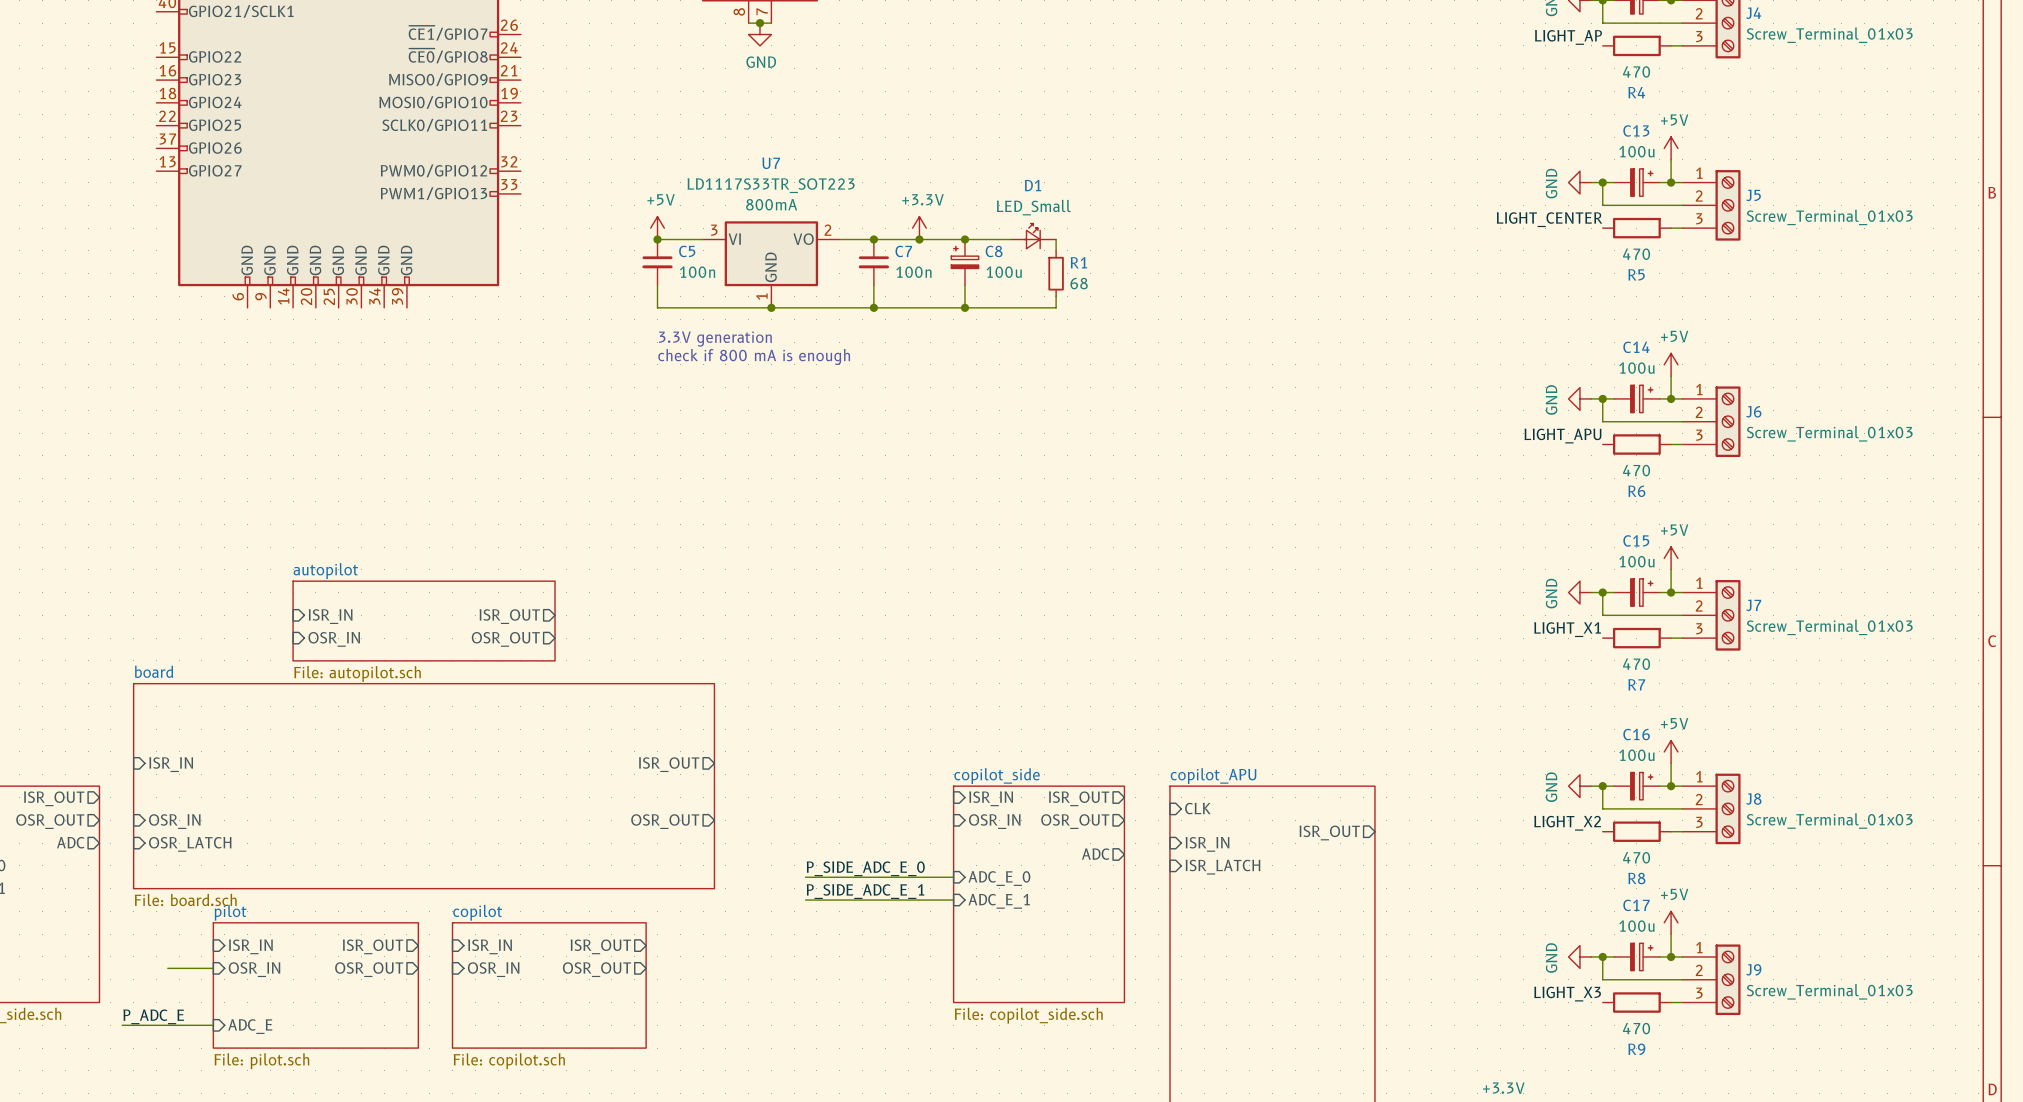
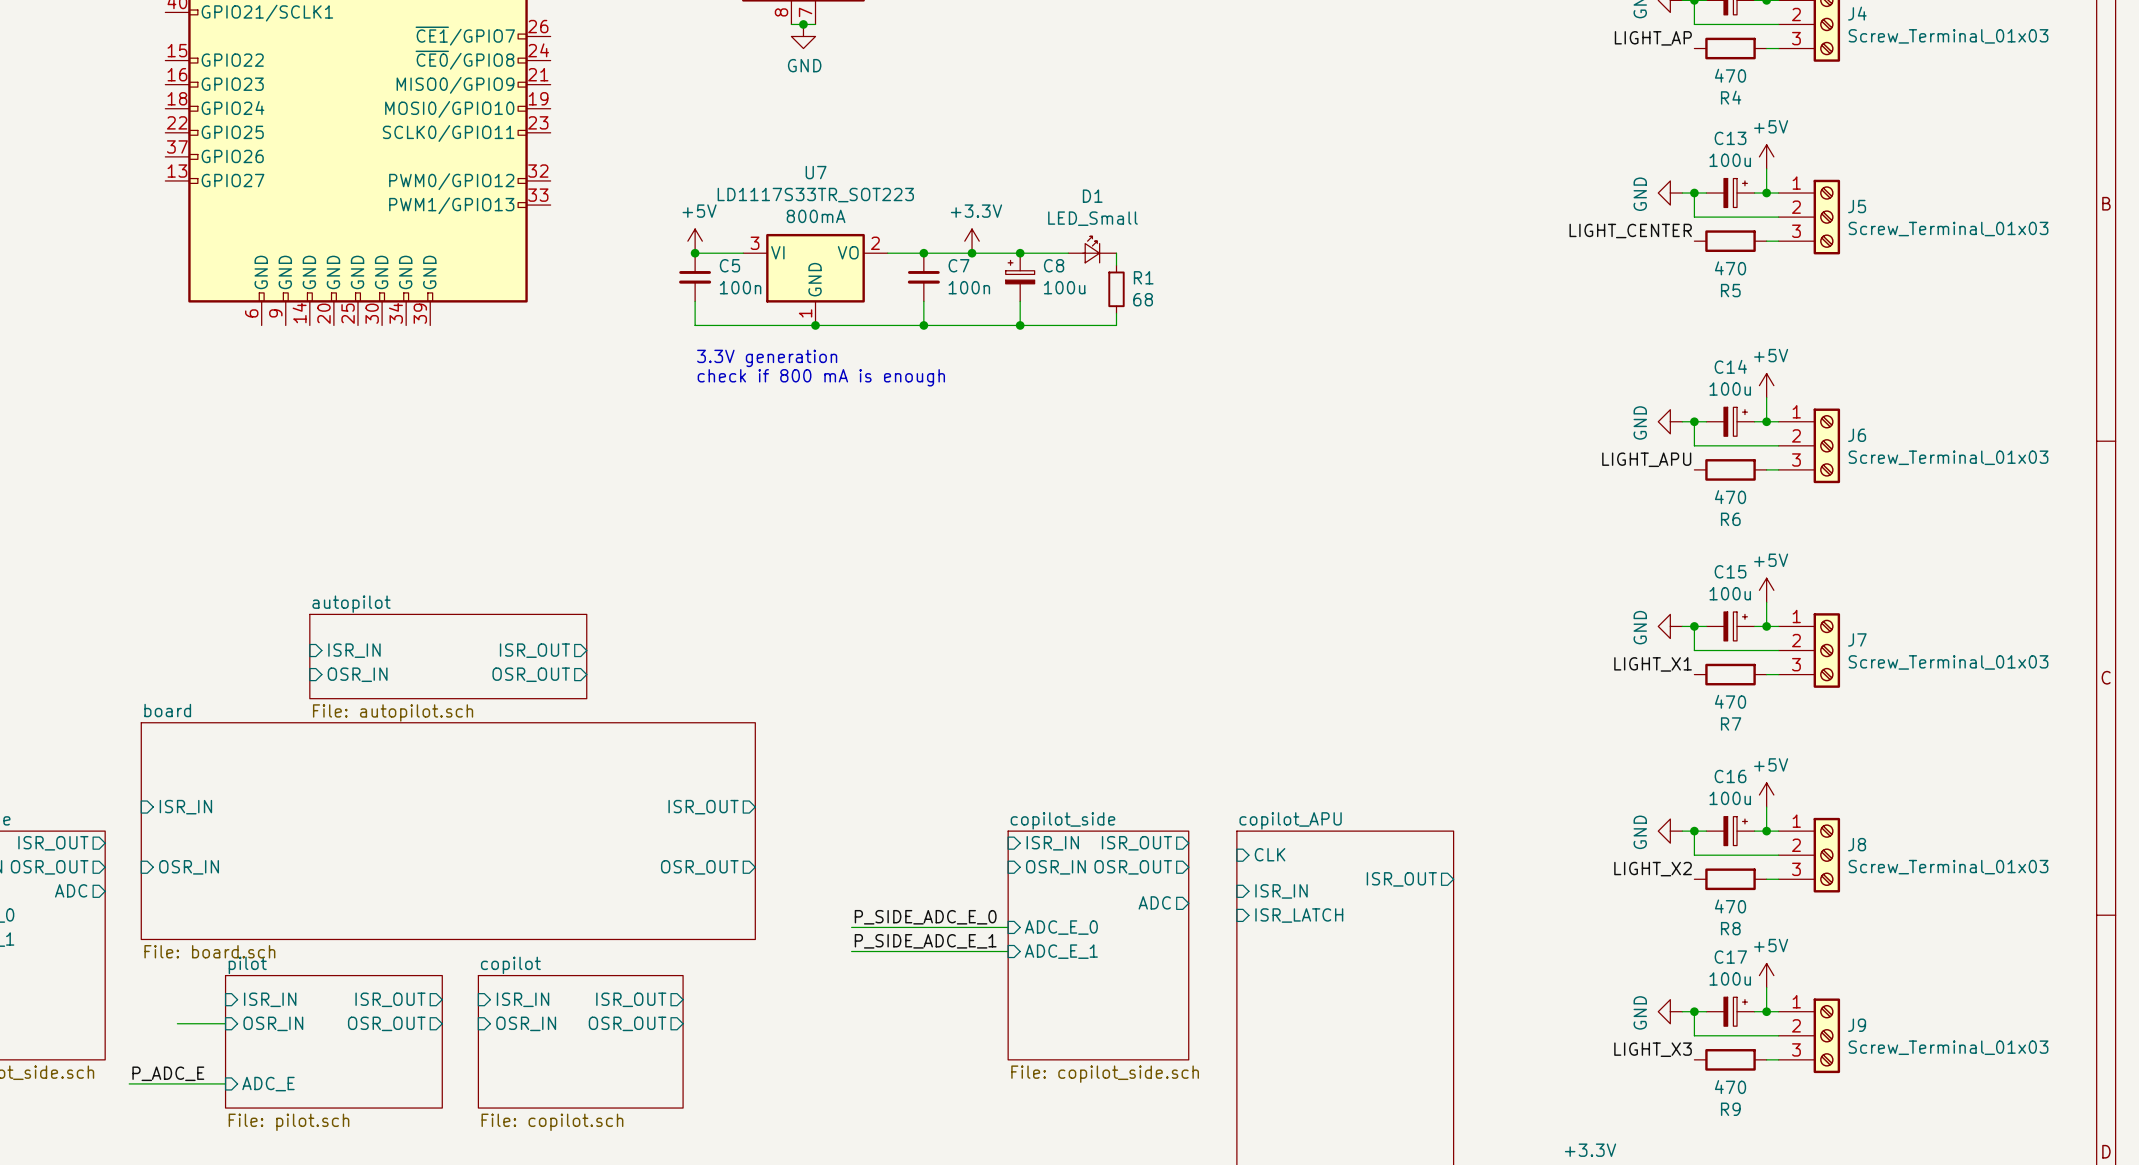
sheet pin: OSR_LATCH (190, 844) -> none

